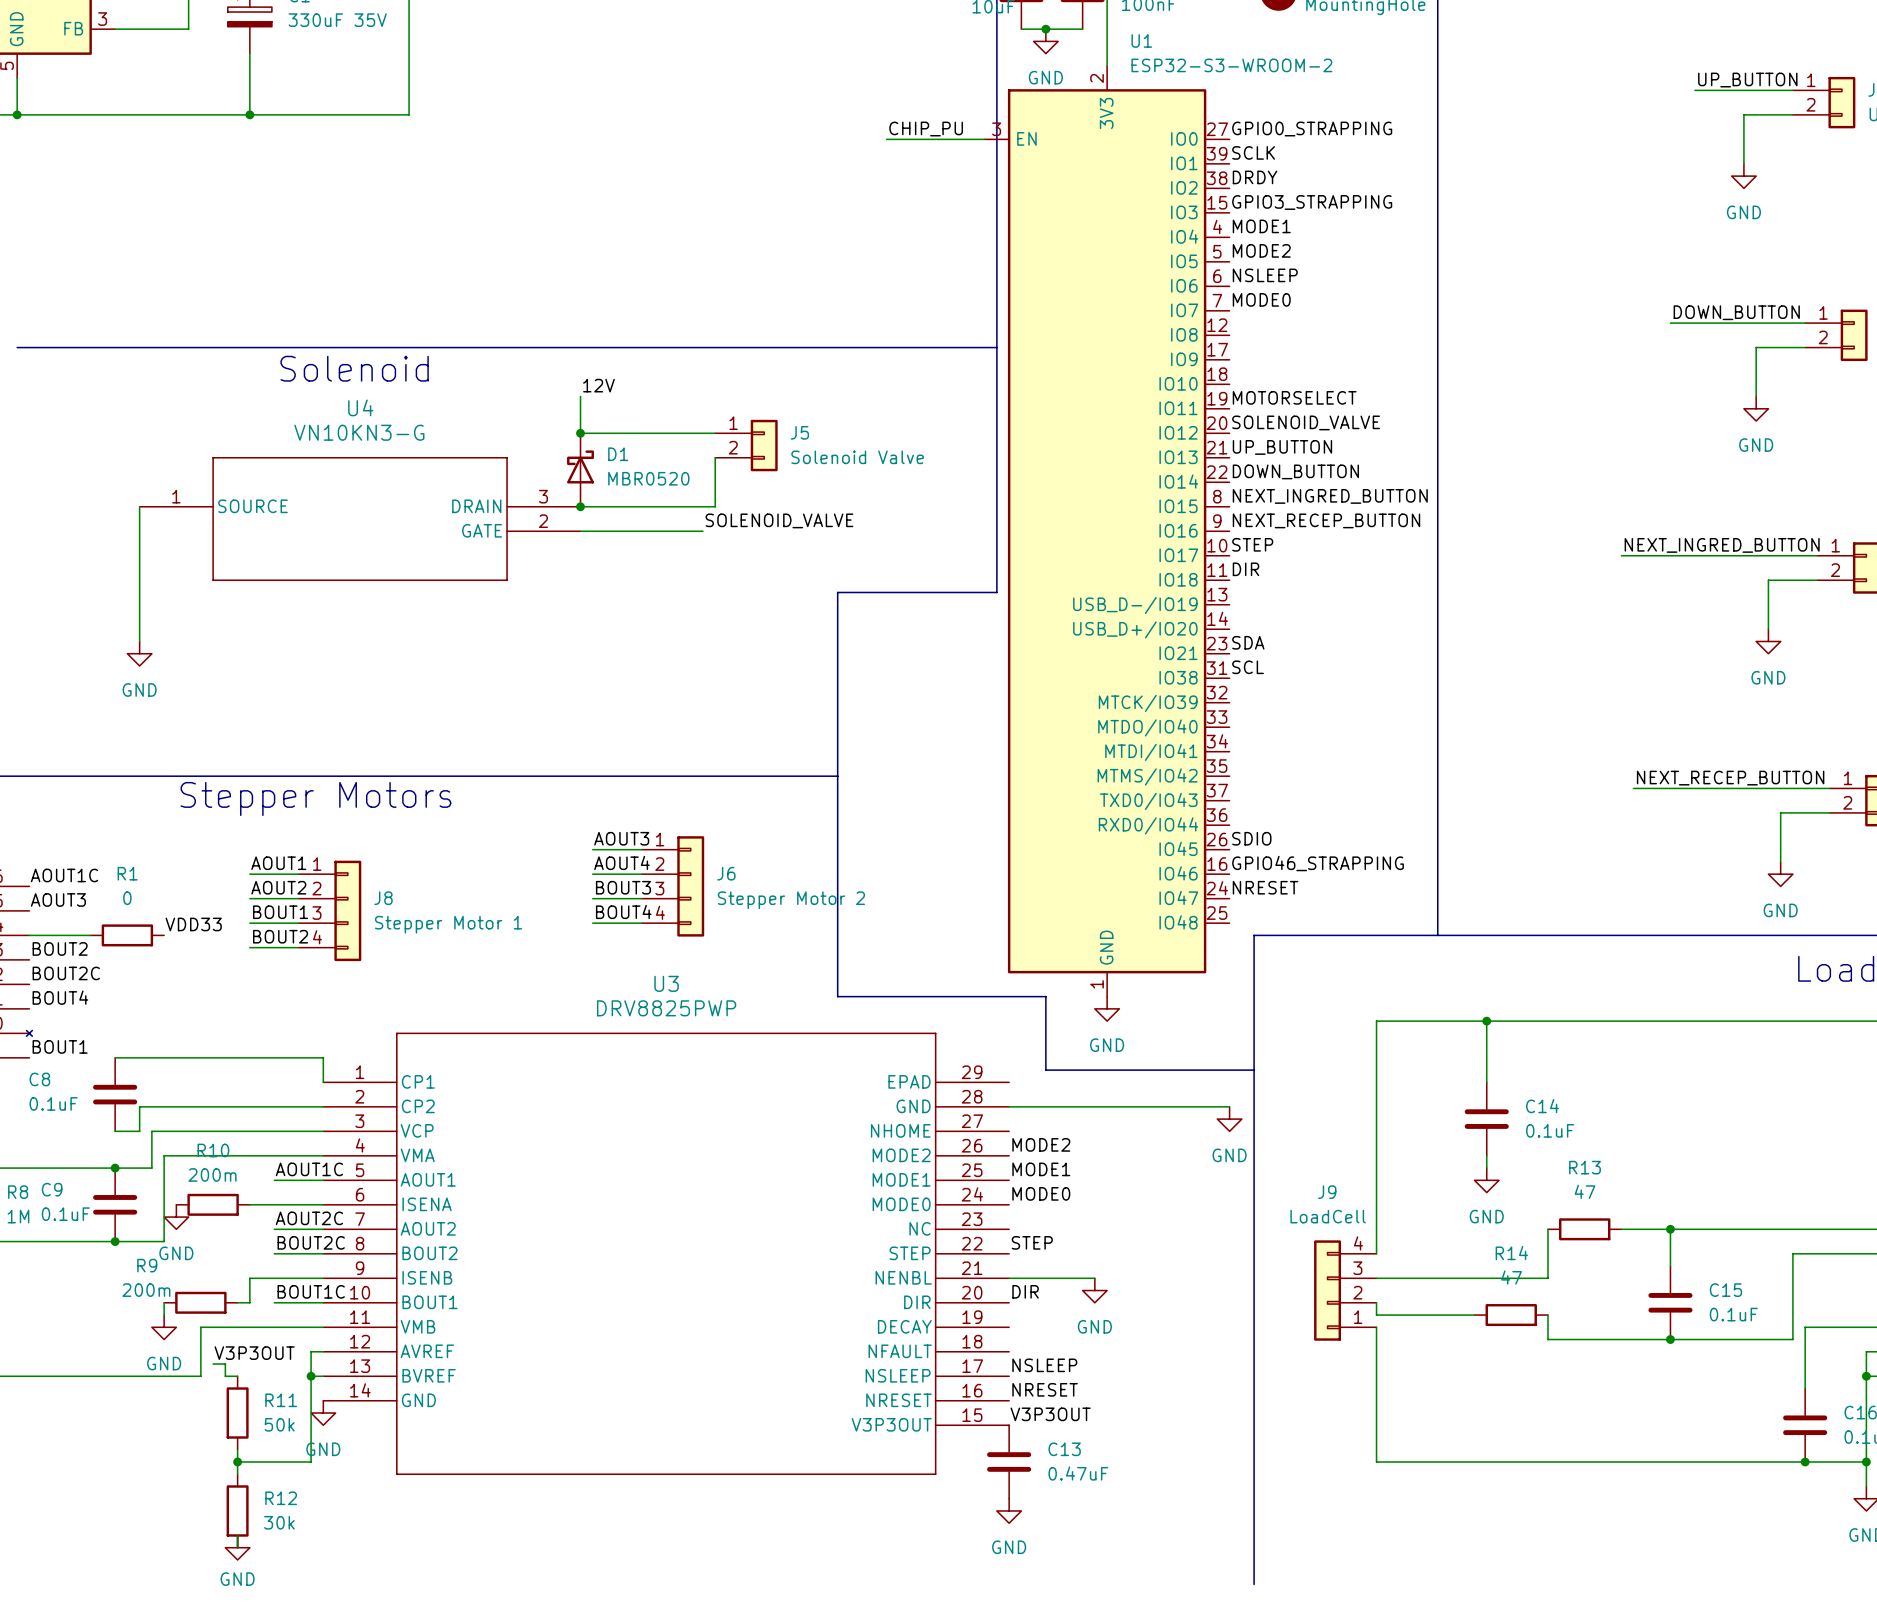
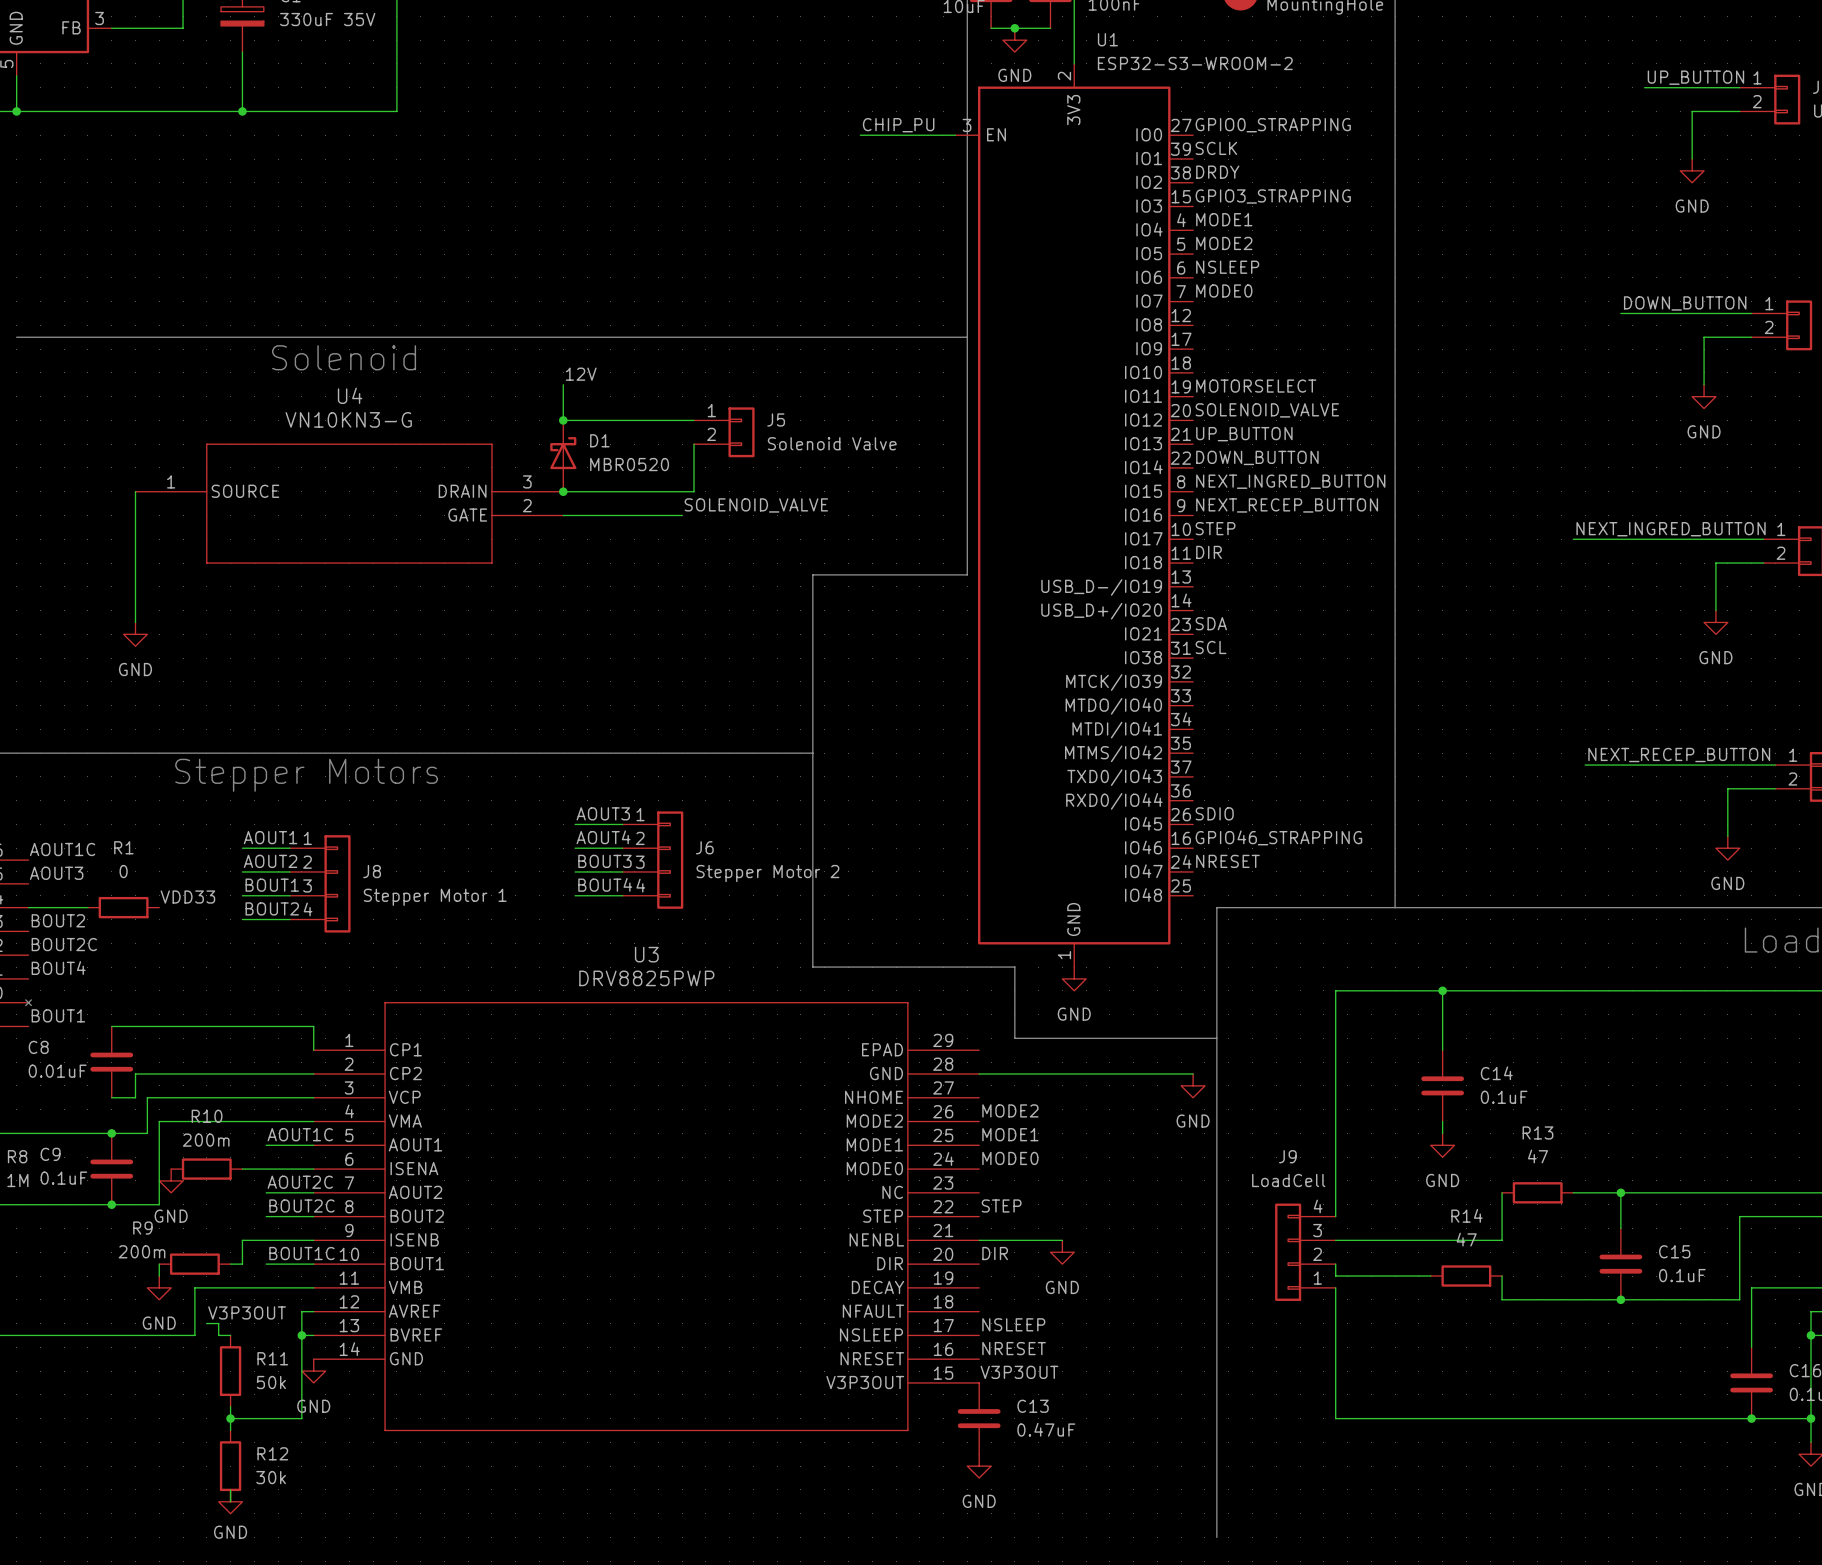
C8 value: 0.1uF (53, 1103) -> 0.01uF (57, 1071)

